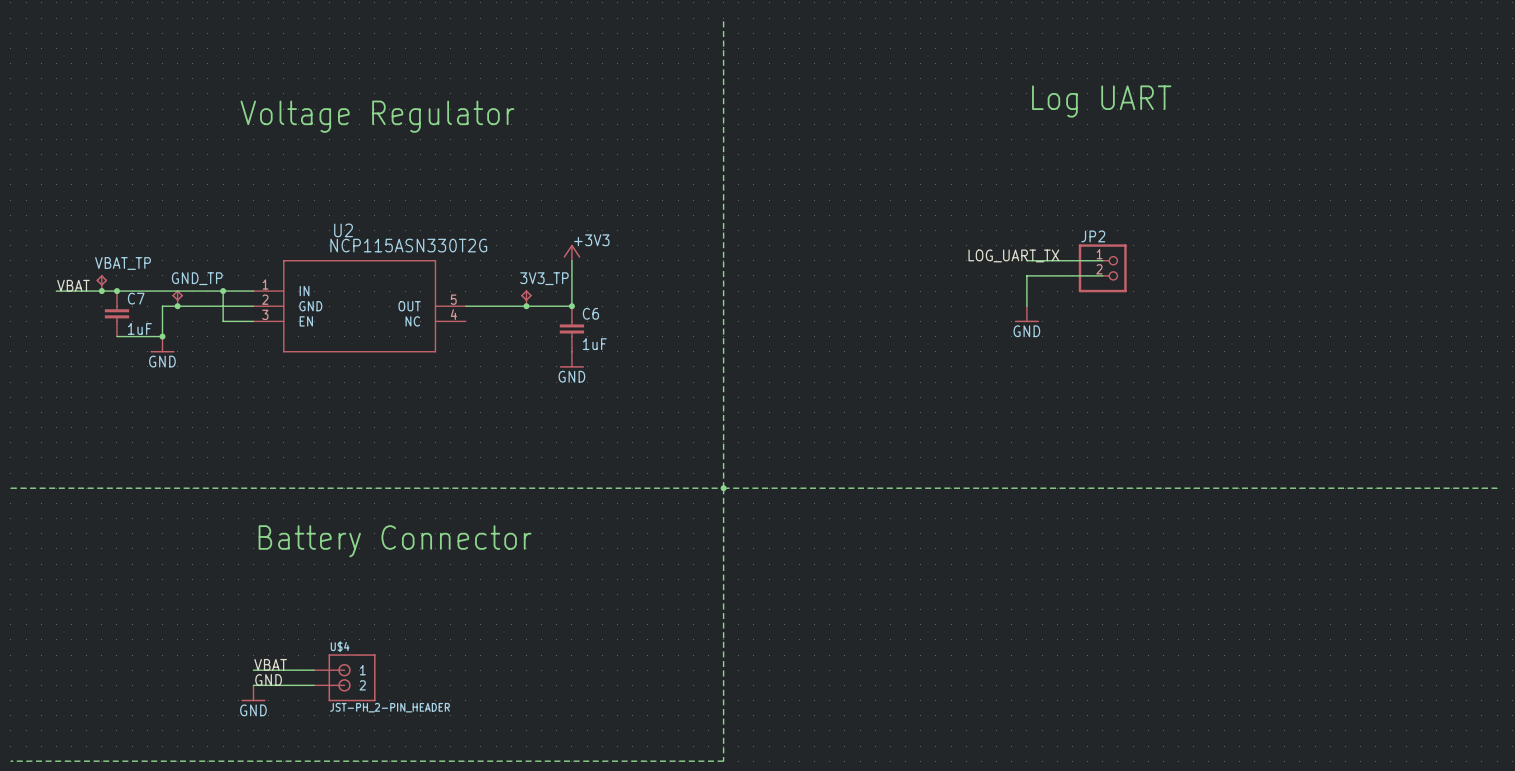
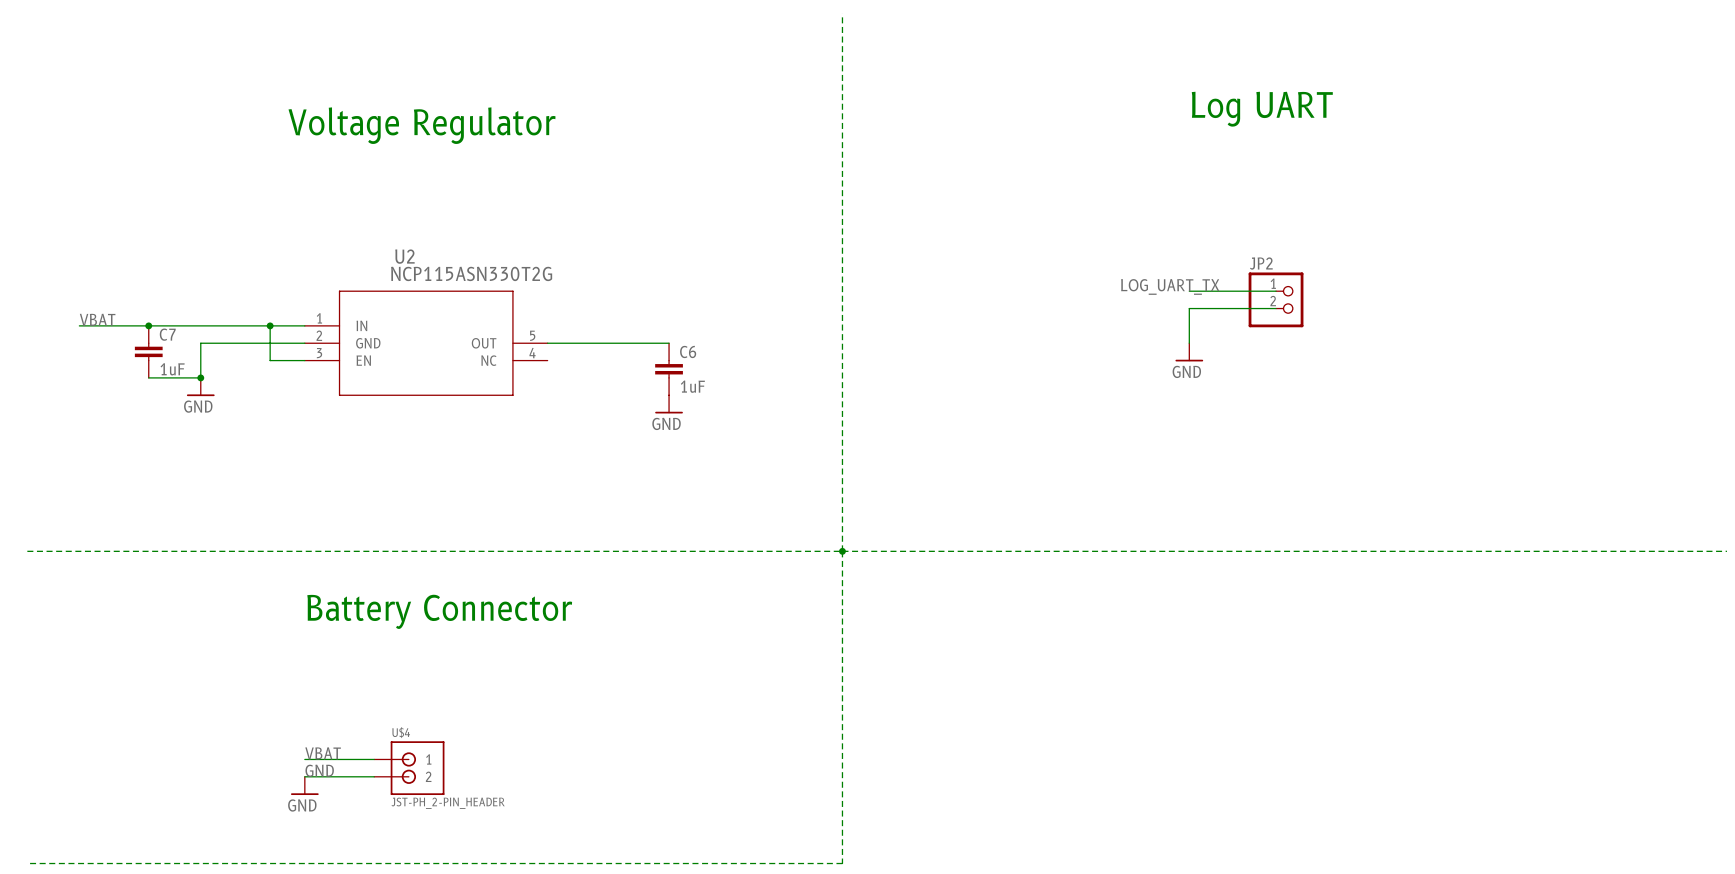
power symbol: +3V3 (571, 252) -> none
wire: (571, 260) (571, 306) -> none
VBAT_TP: (101, 283) -> none
junction: (101, 291) -> none
GND_TP: (177, 298) -> none
3V3_TP: (526, 298) -> none
junction: (177, 306) -> none
junction: (526, 306) -> none
junction: (571, 306) -> none

